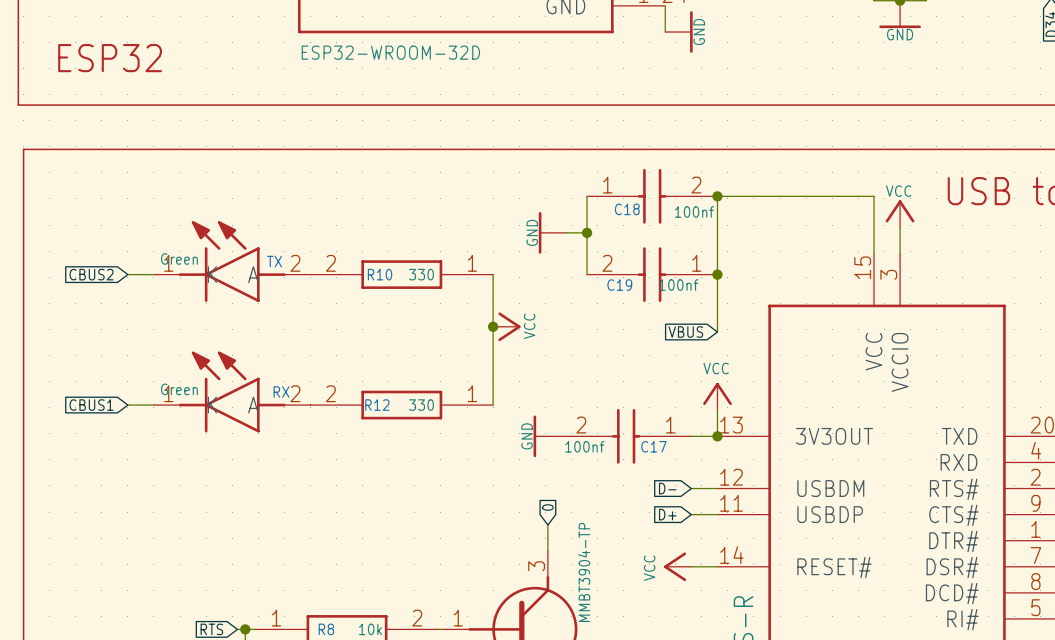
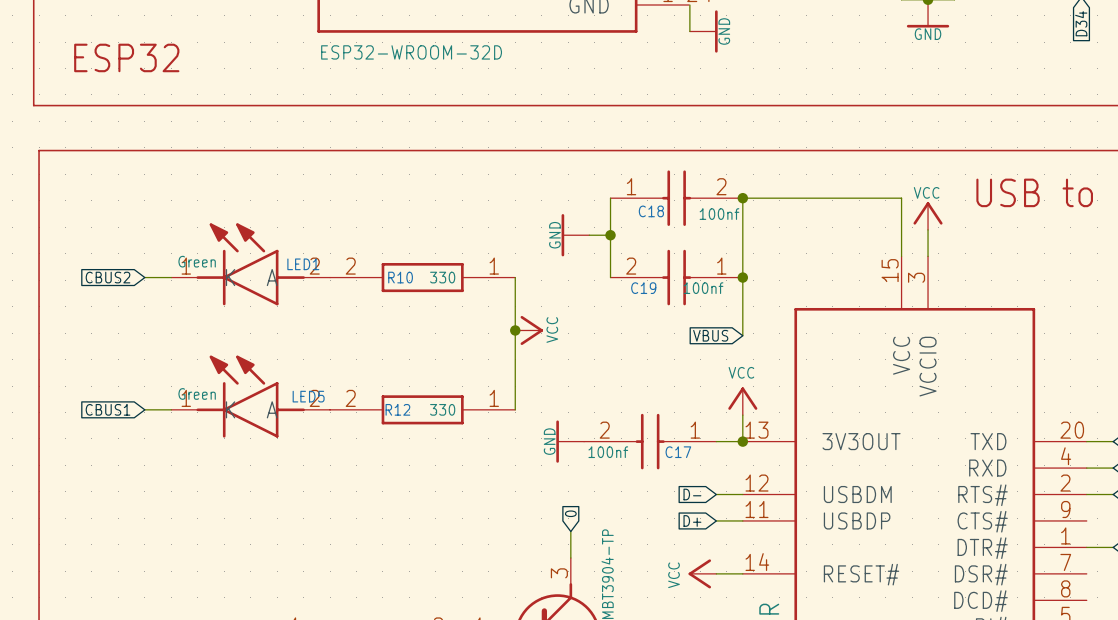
TX name: TX (274, 261) -> LED1 (303, 264)
RX name: RX (281, 392) -> LED5 (308, 396)

